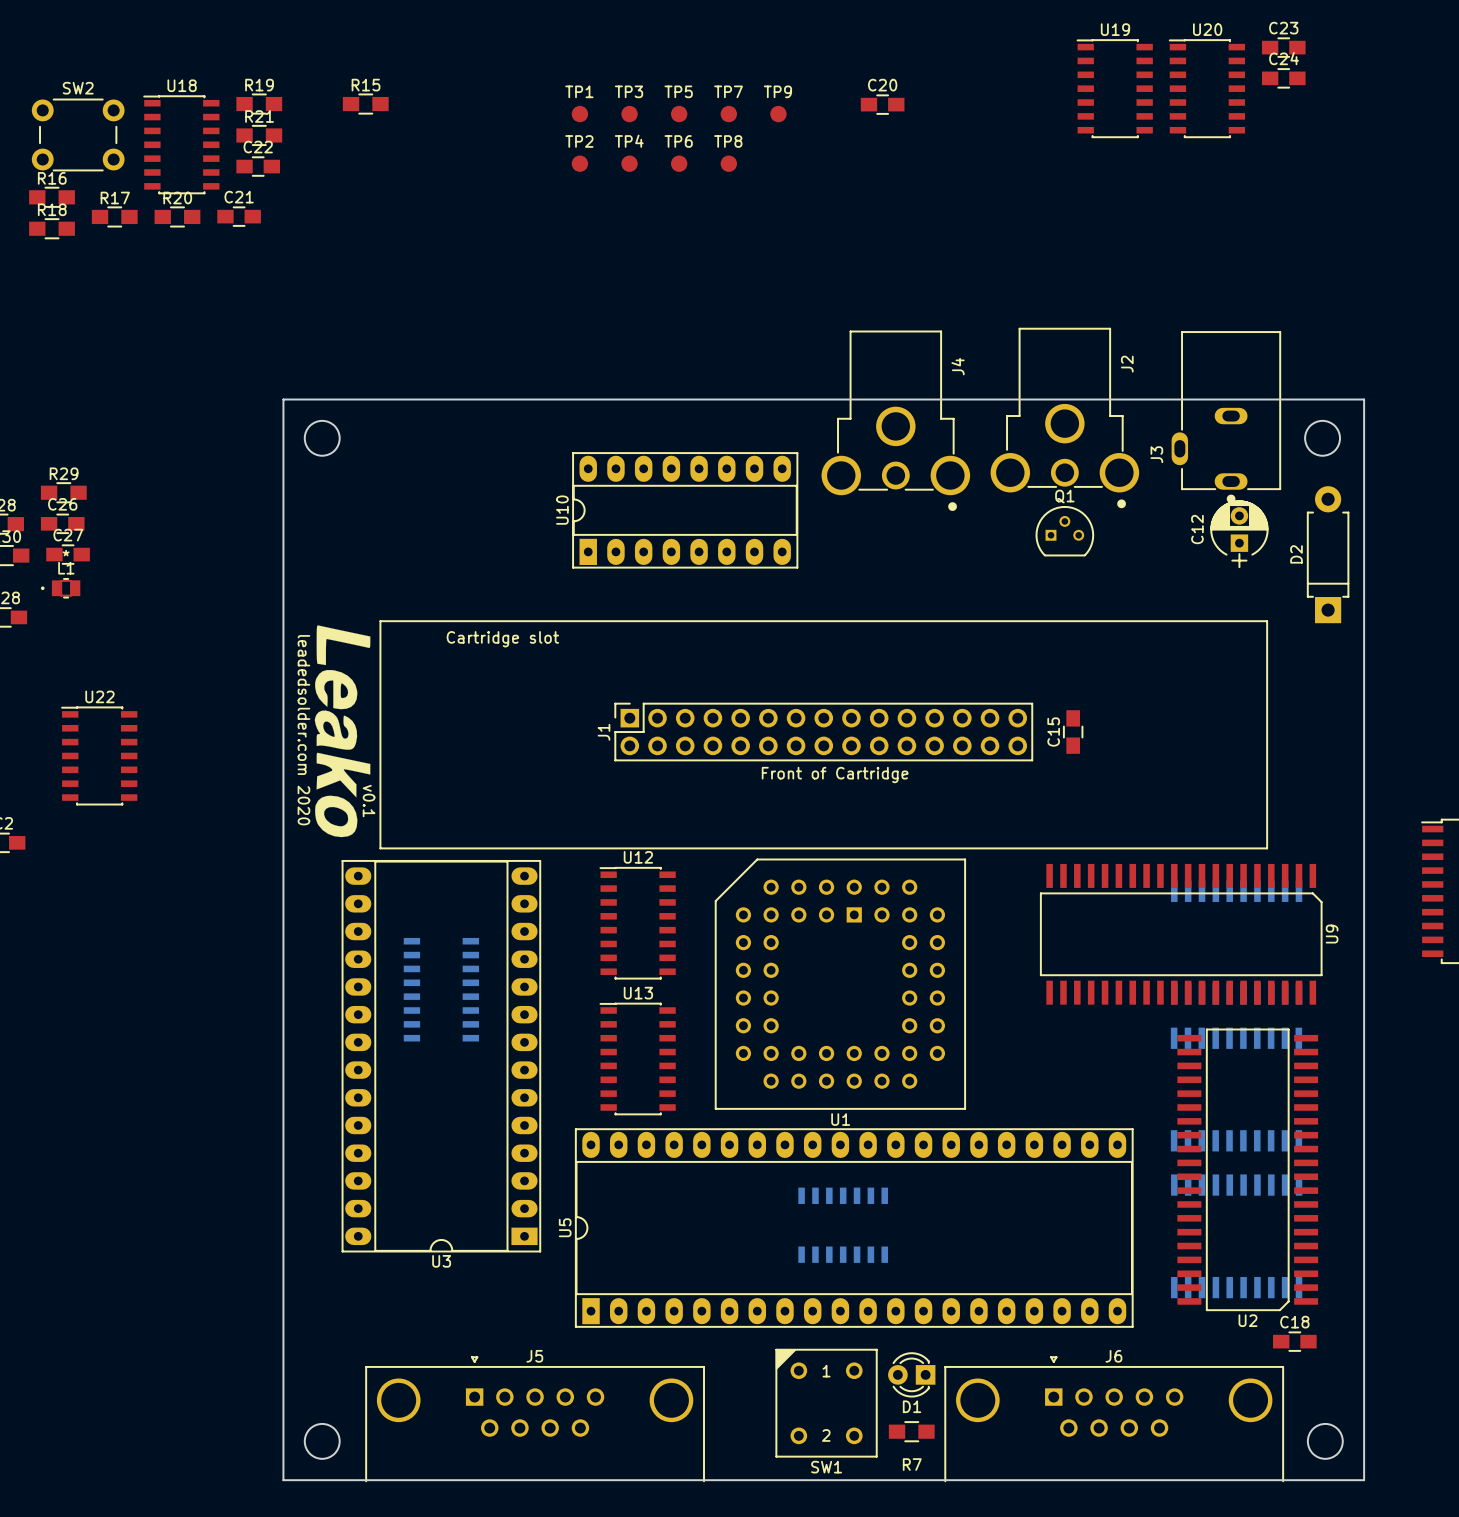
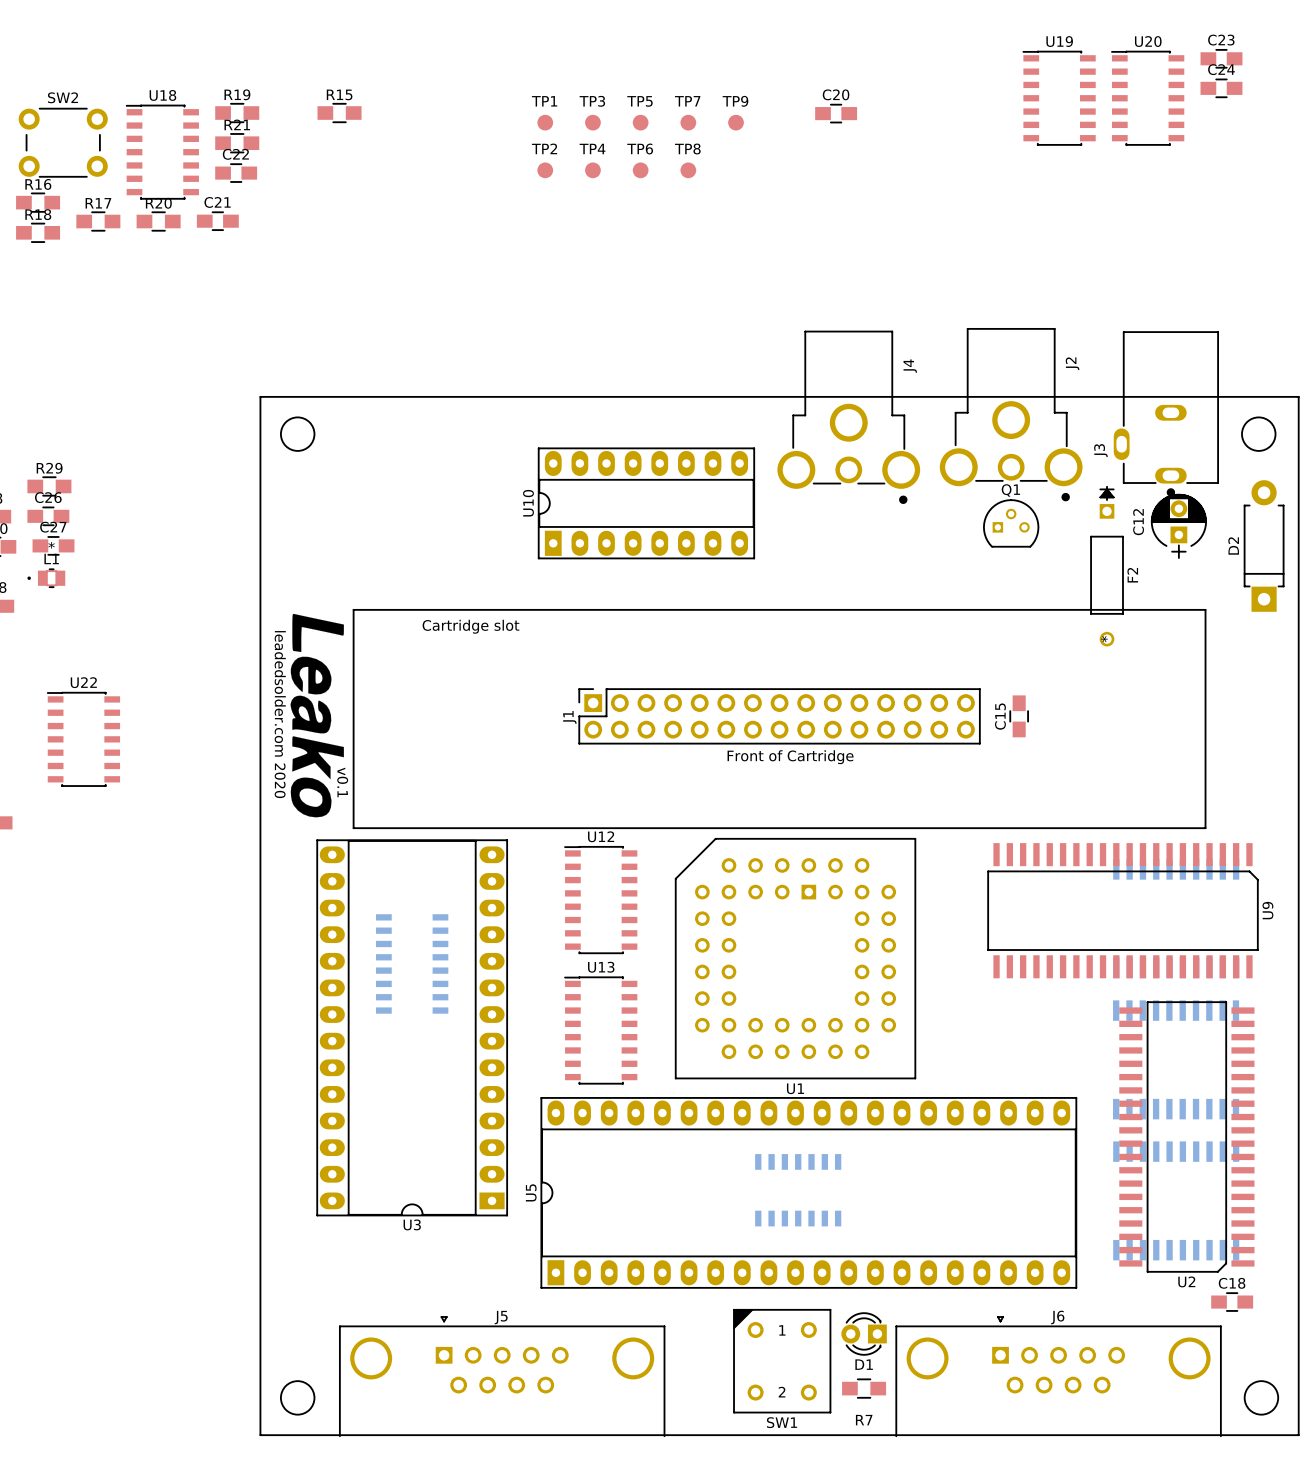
F2: none -> (1107, 566)

